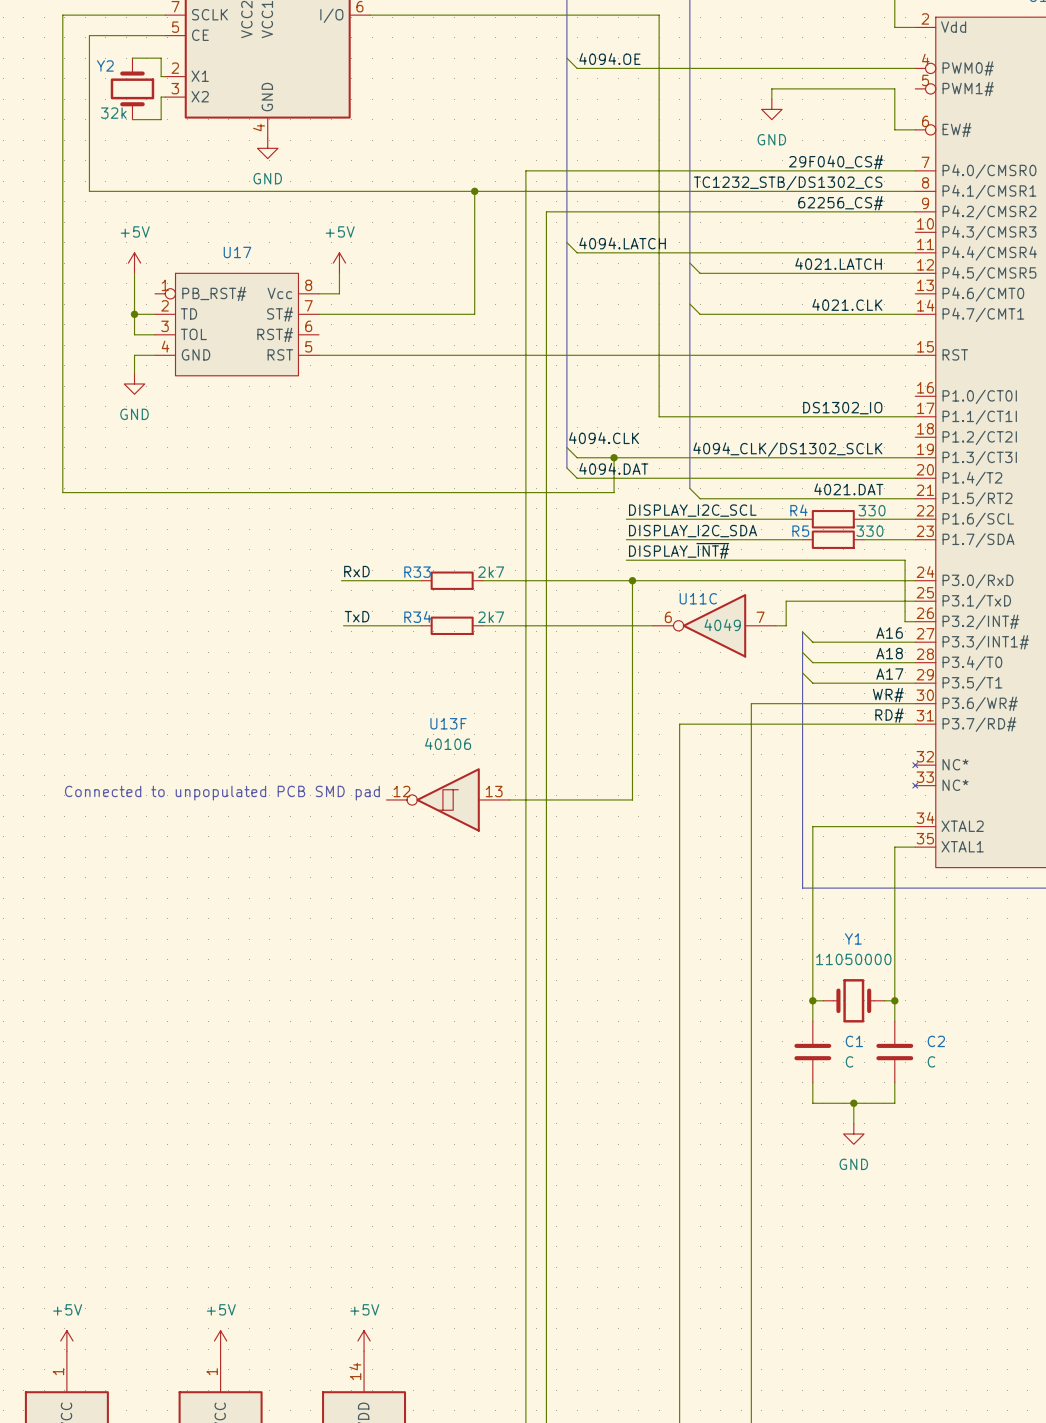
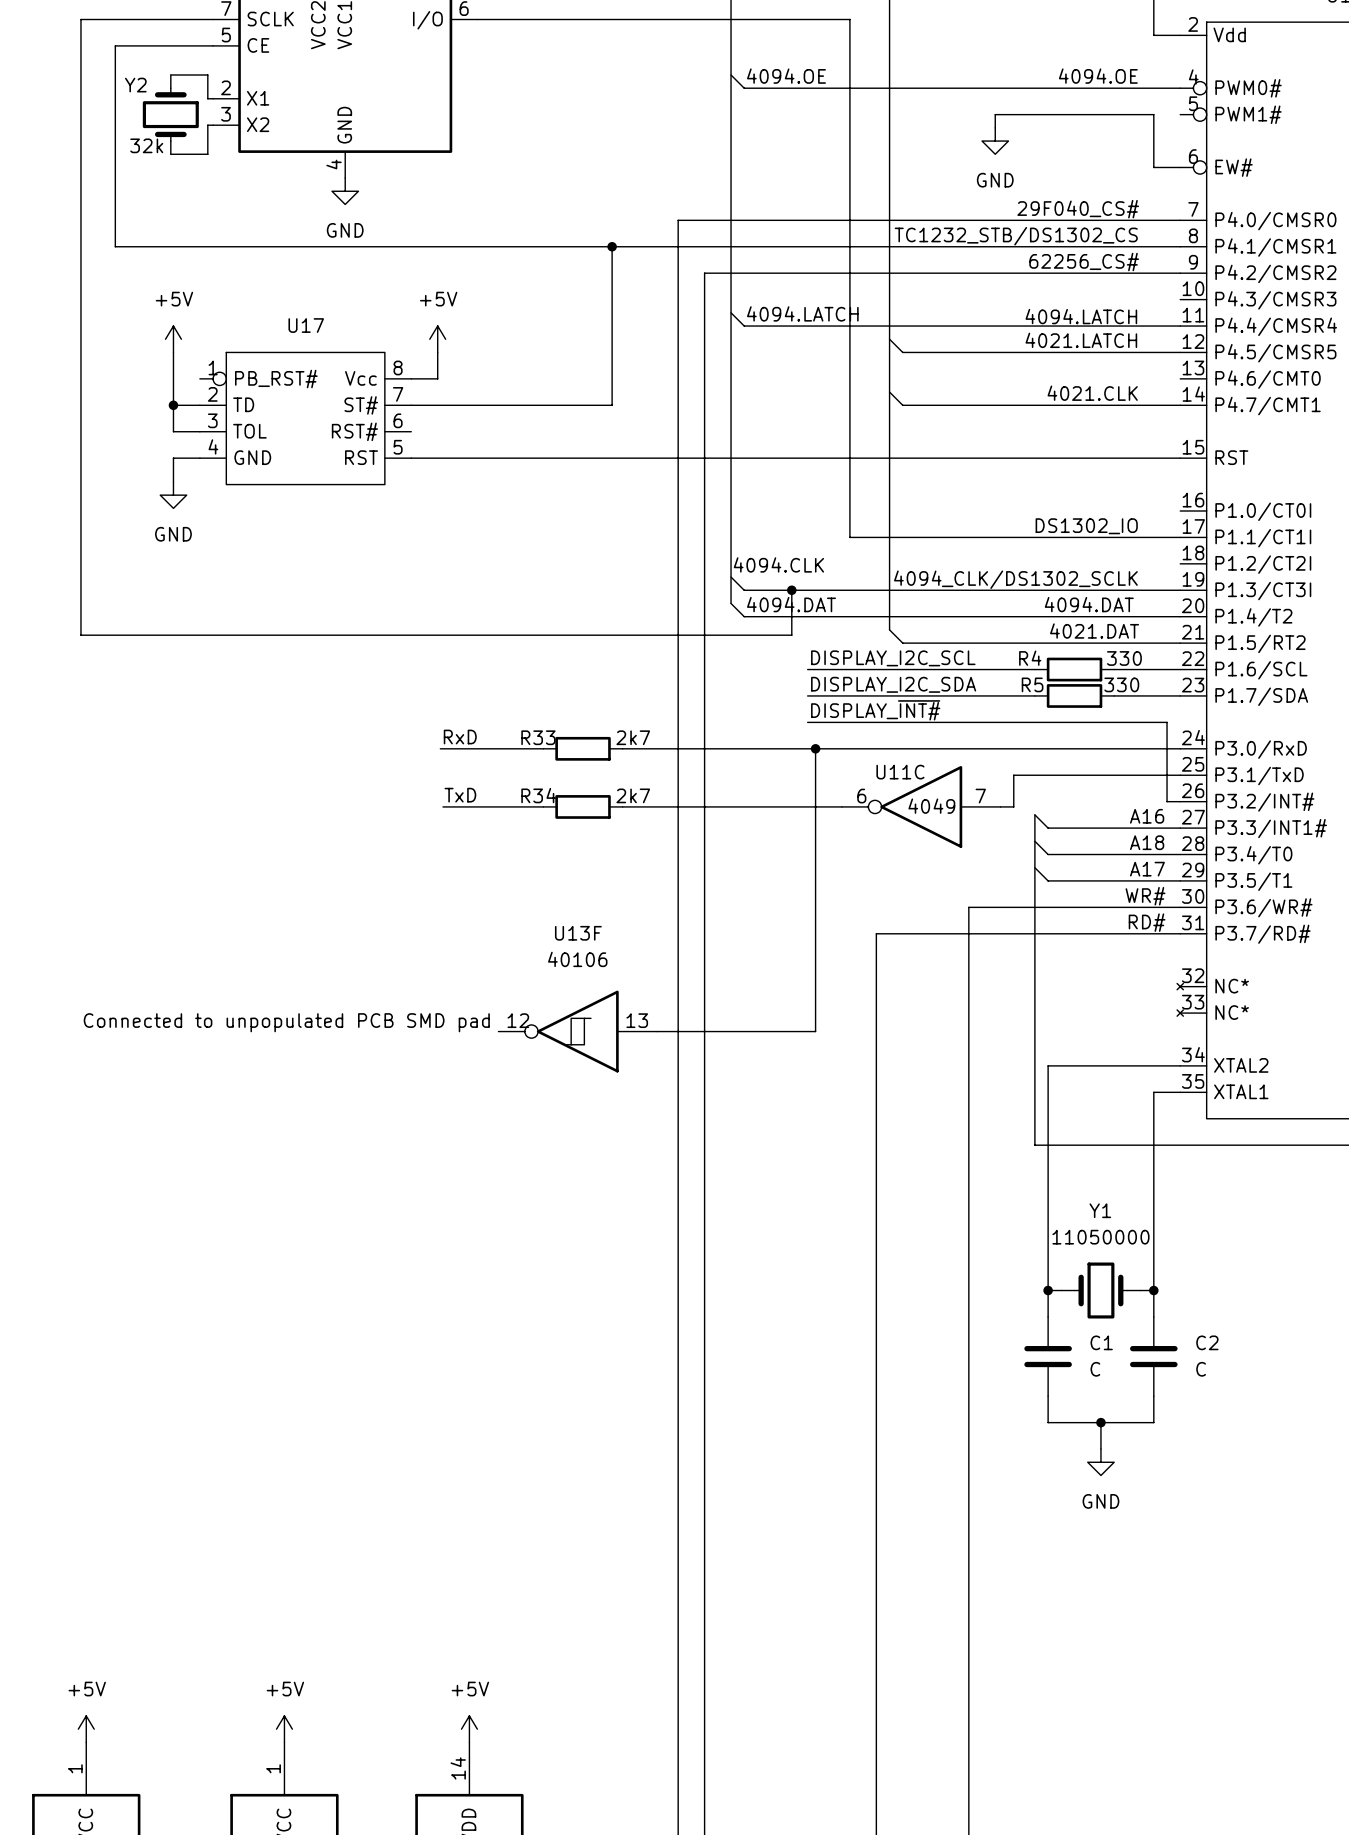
label: none -> 4094.OE (1098, 76)
label: none -> 4094.LATCH (1081, 316)
label: none -> 4094.DAT (1089, 604)

